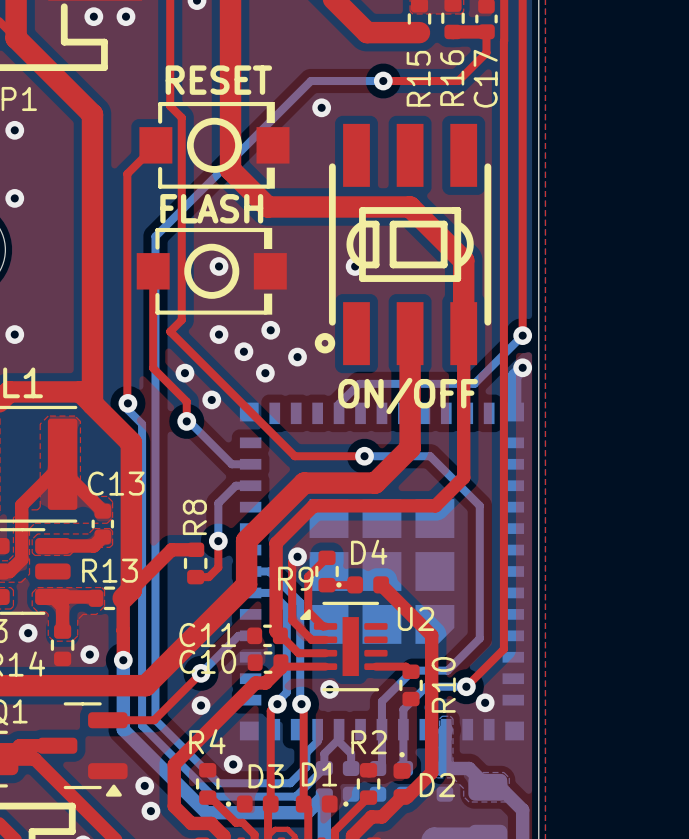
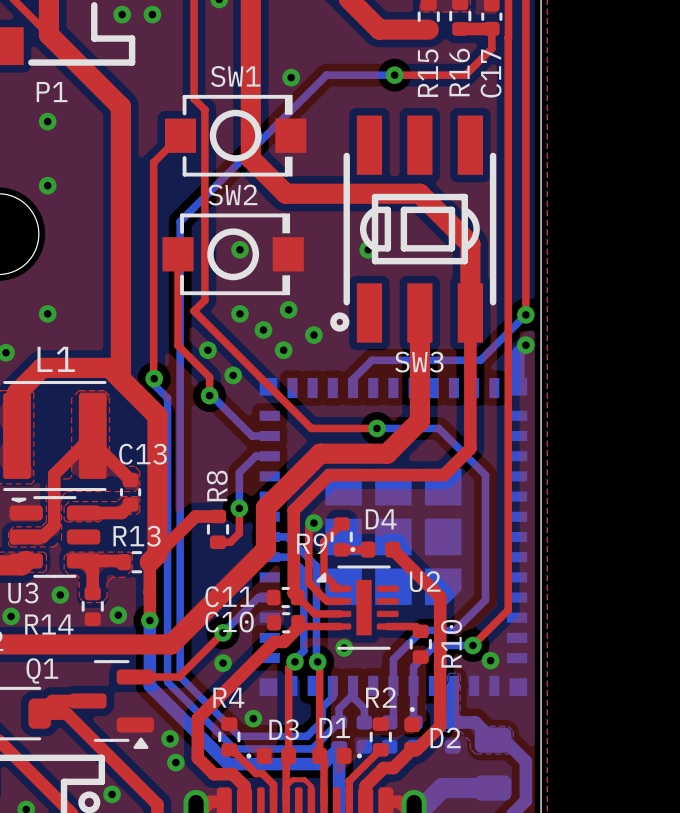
text: RESET (218, 80) -> none
SW1 name: none -> SW1 (235, 76)
via position: (321, 107) -> (291, 77)
SW2 name: none -> SW2 (232, 195)
text: FLASH (211, 208) -> none
SW3 name: none -> SW3 (419, 362)
text: ON/OFF (407, 395) -> none

